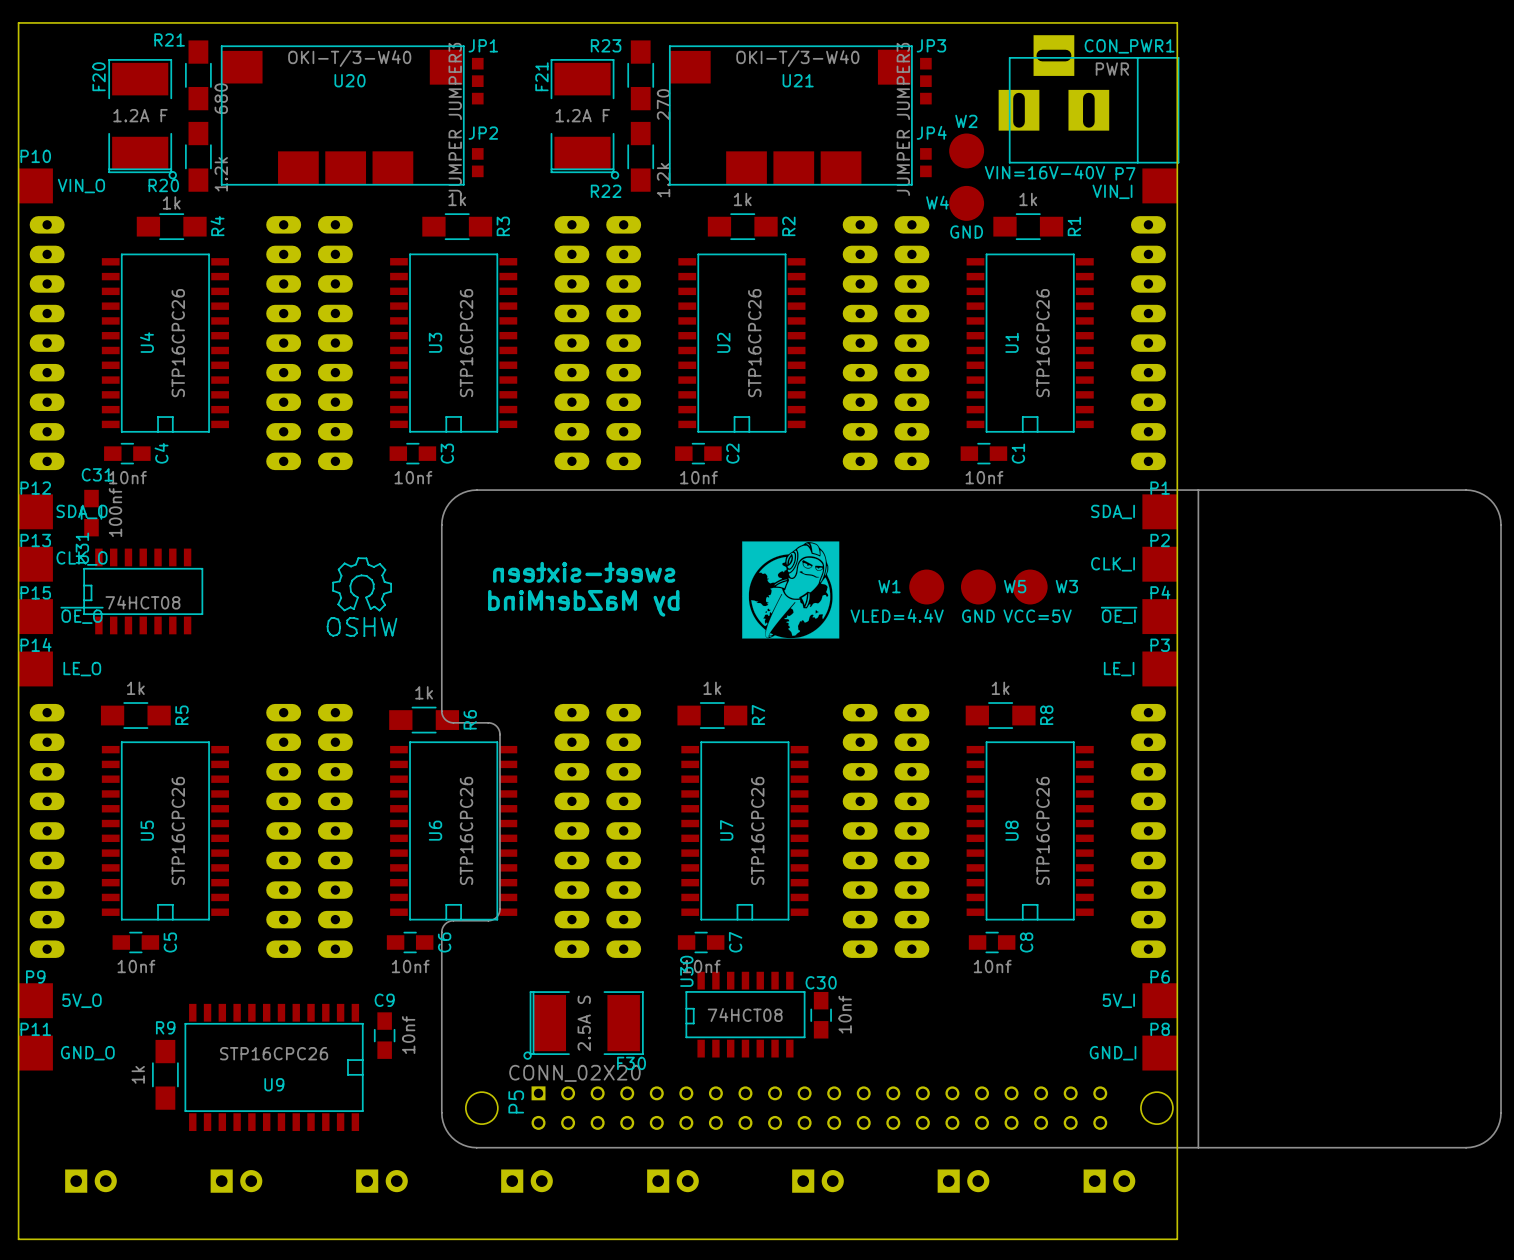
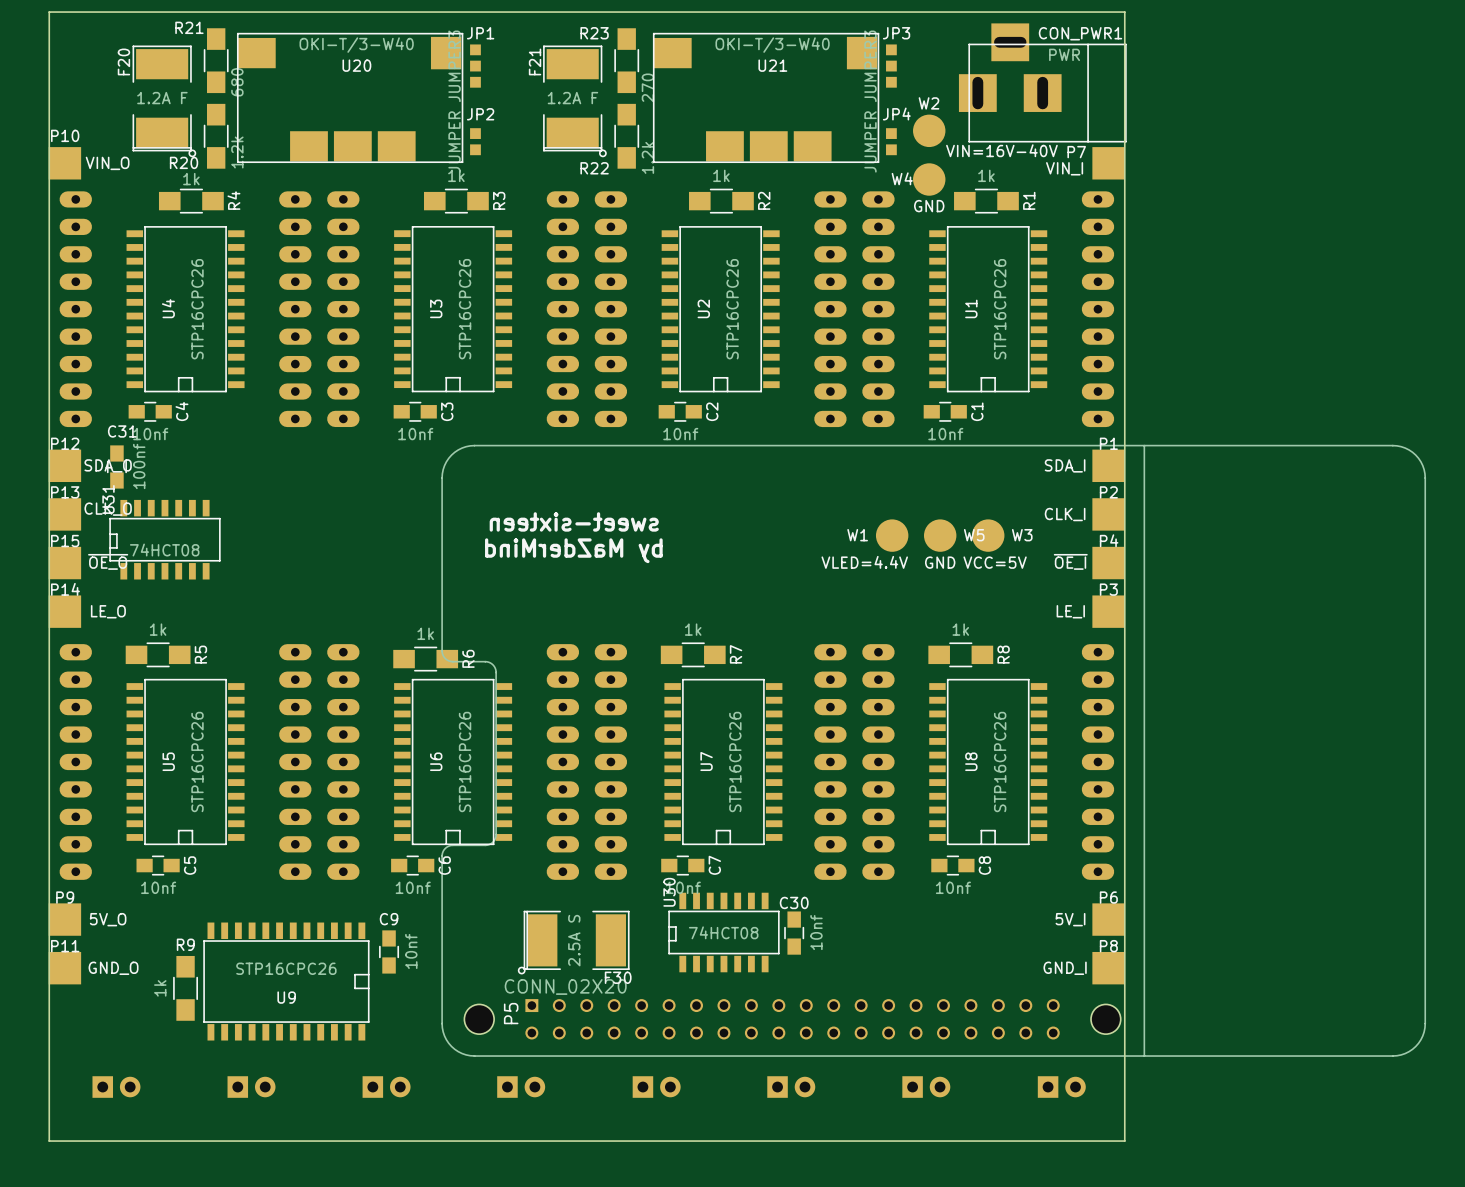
drawing: [742, 541, 840, 639] -> none
drawing: [326, 557, 398, 638] -> none

